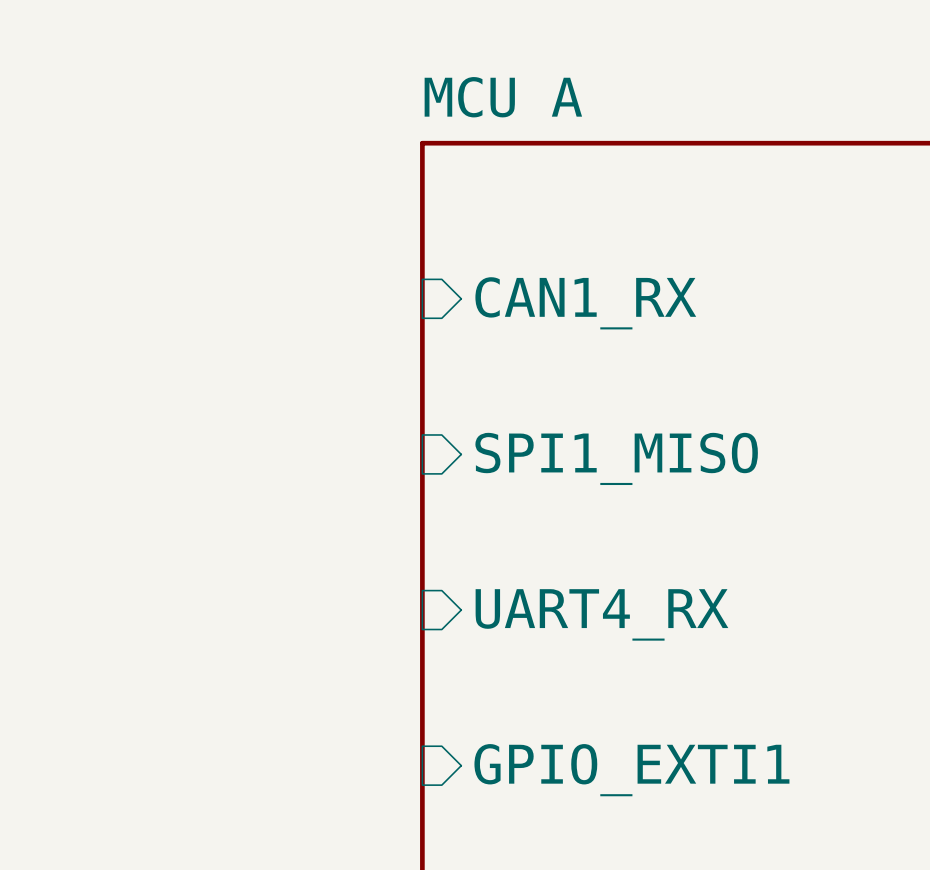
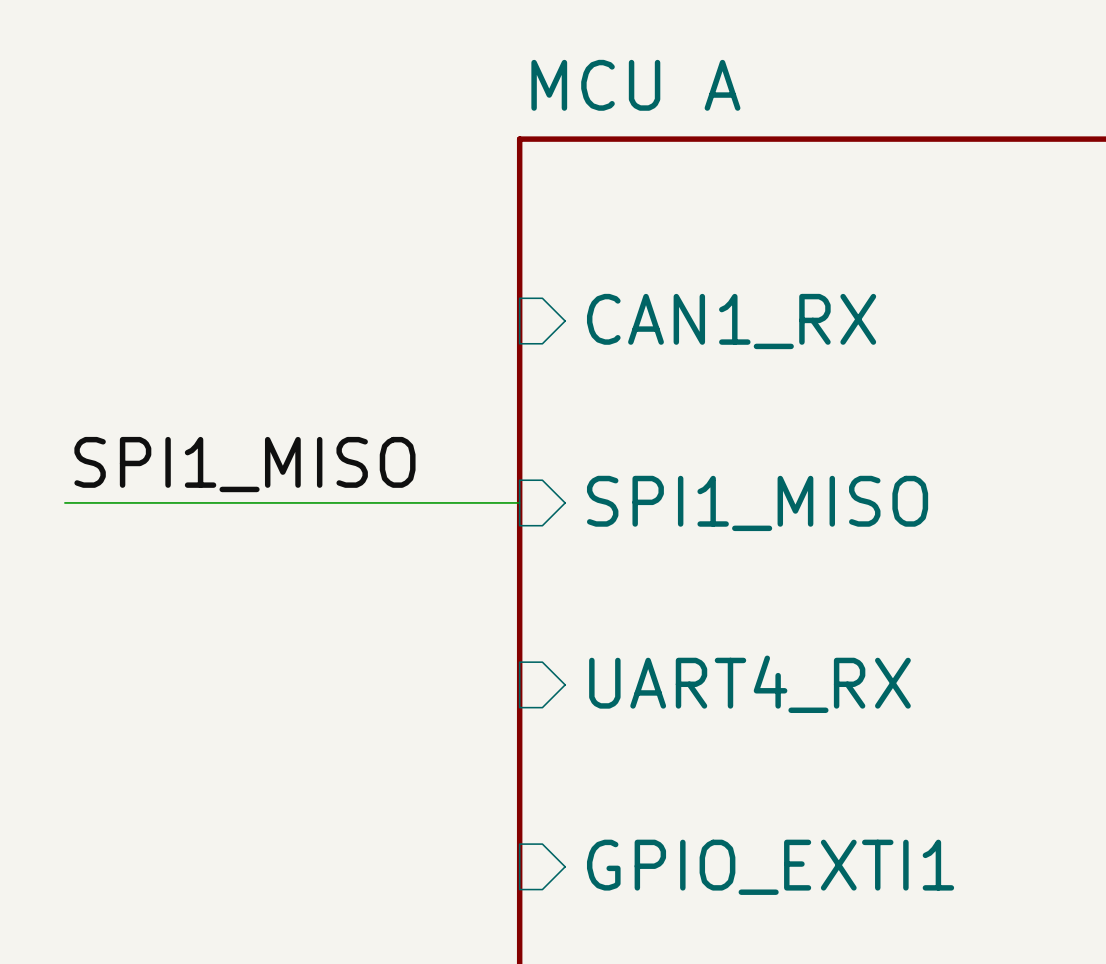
label: none -> SPI1_MISO (244, 464)
wire: none -> (64, 502) (519, 502)

